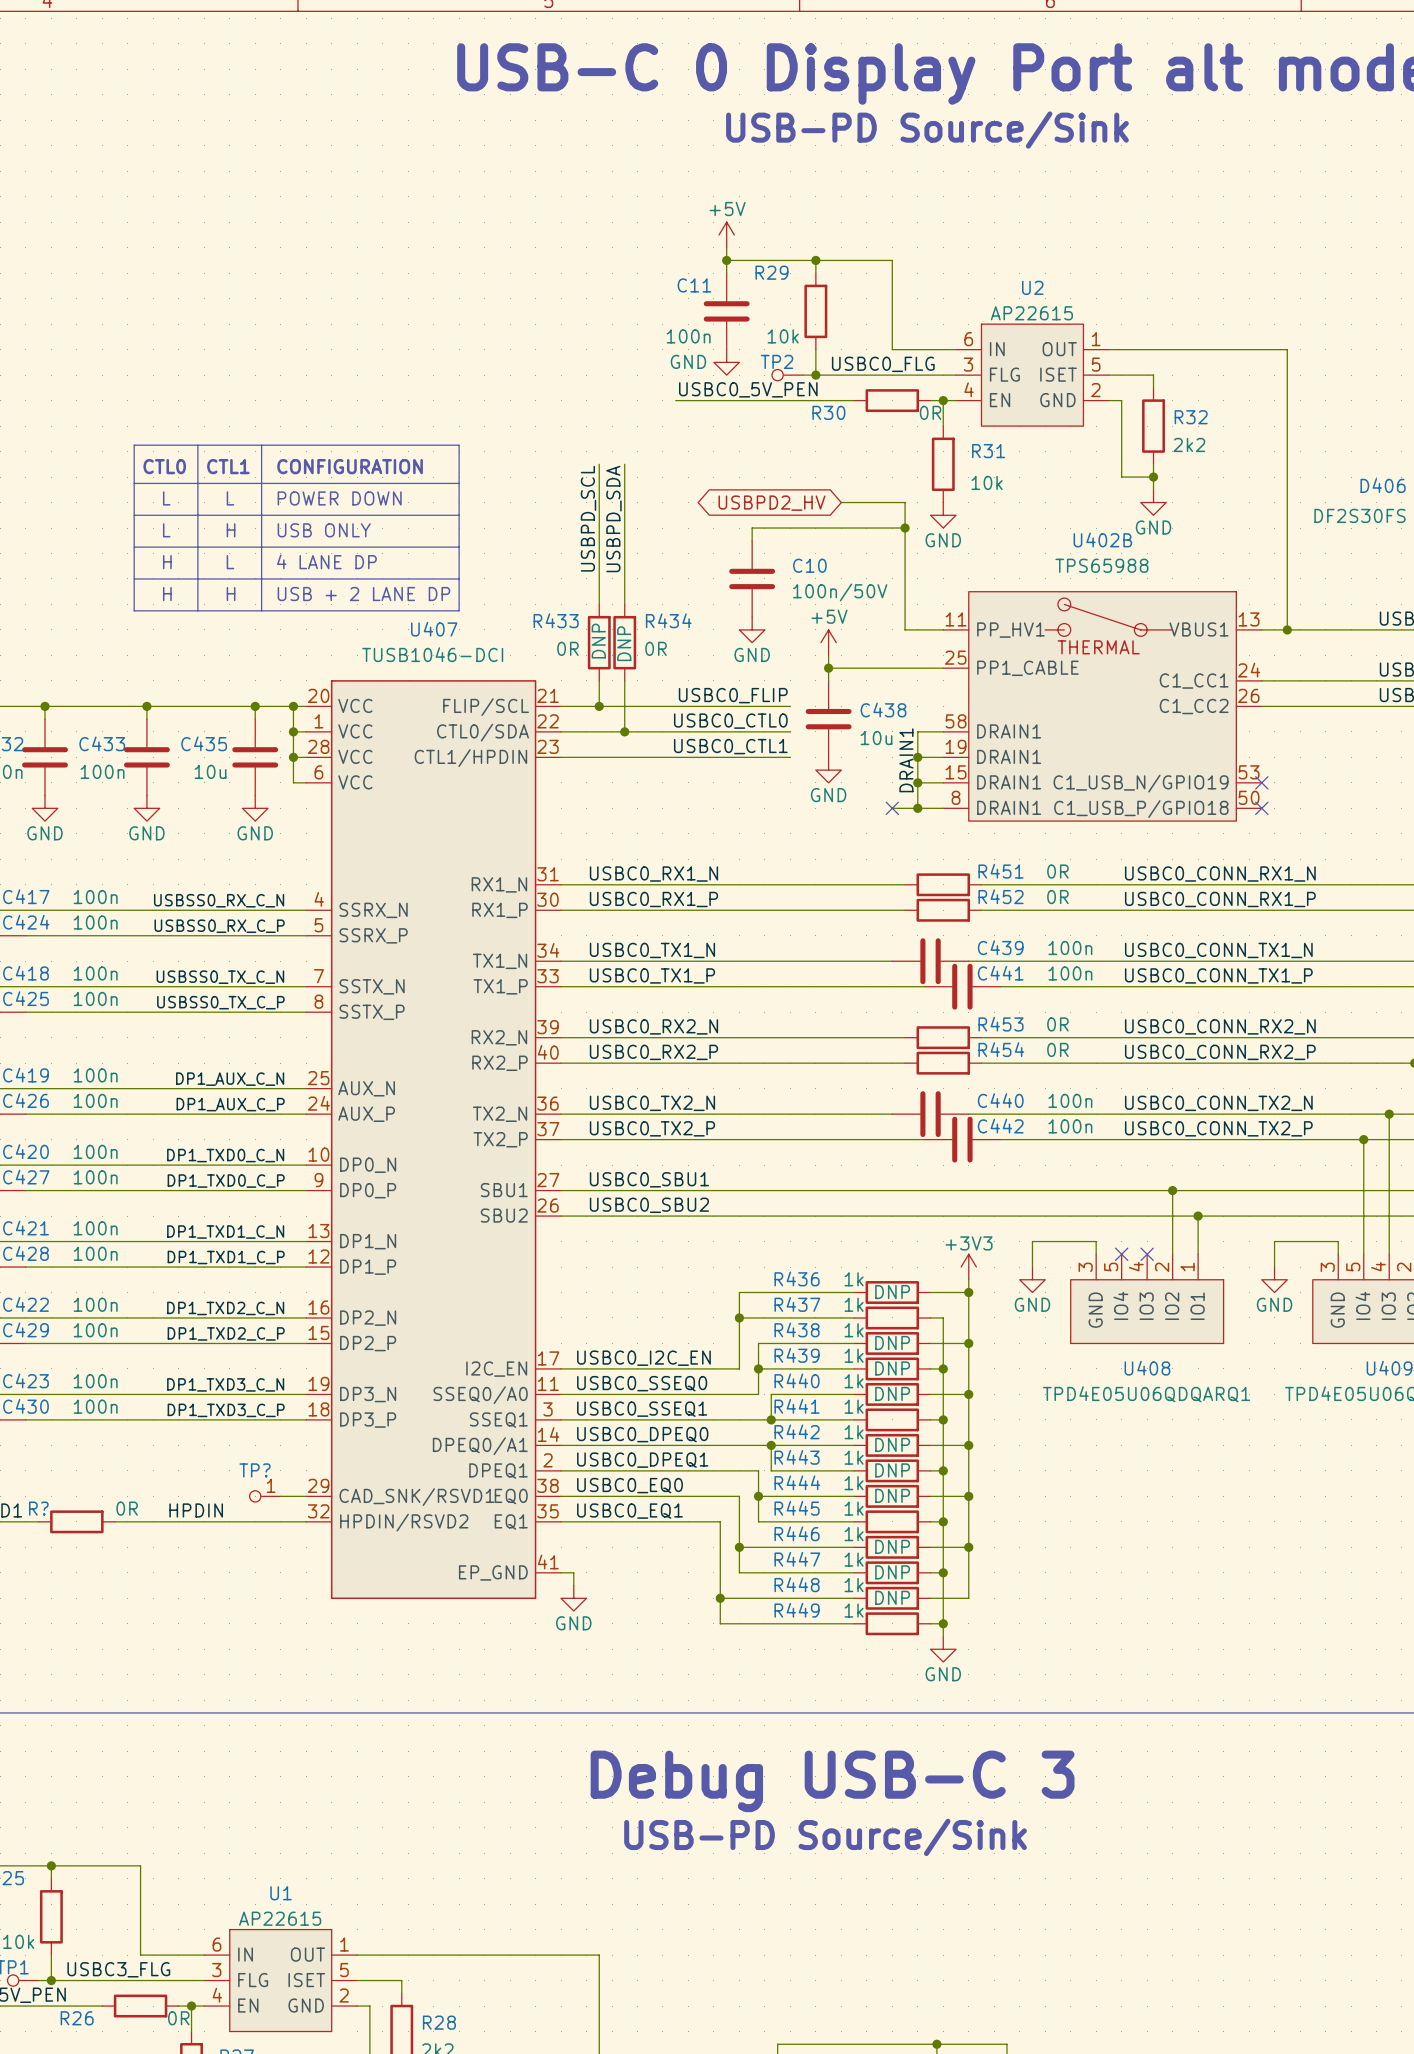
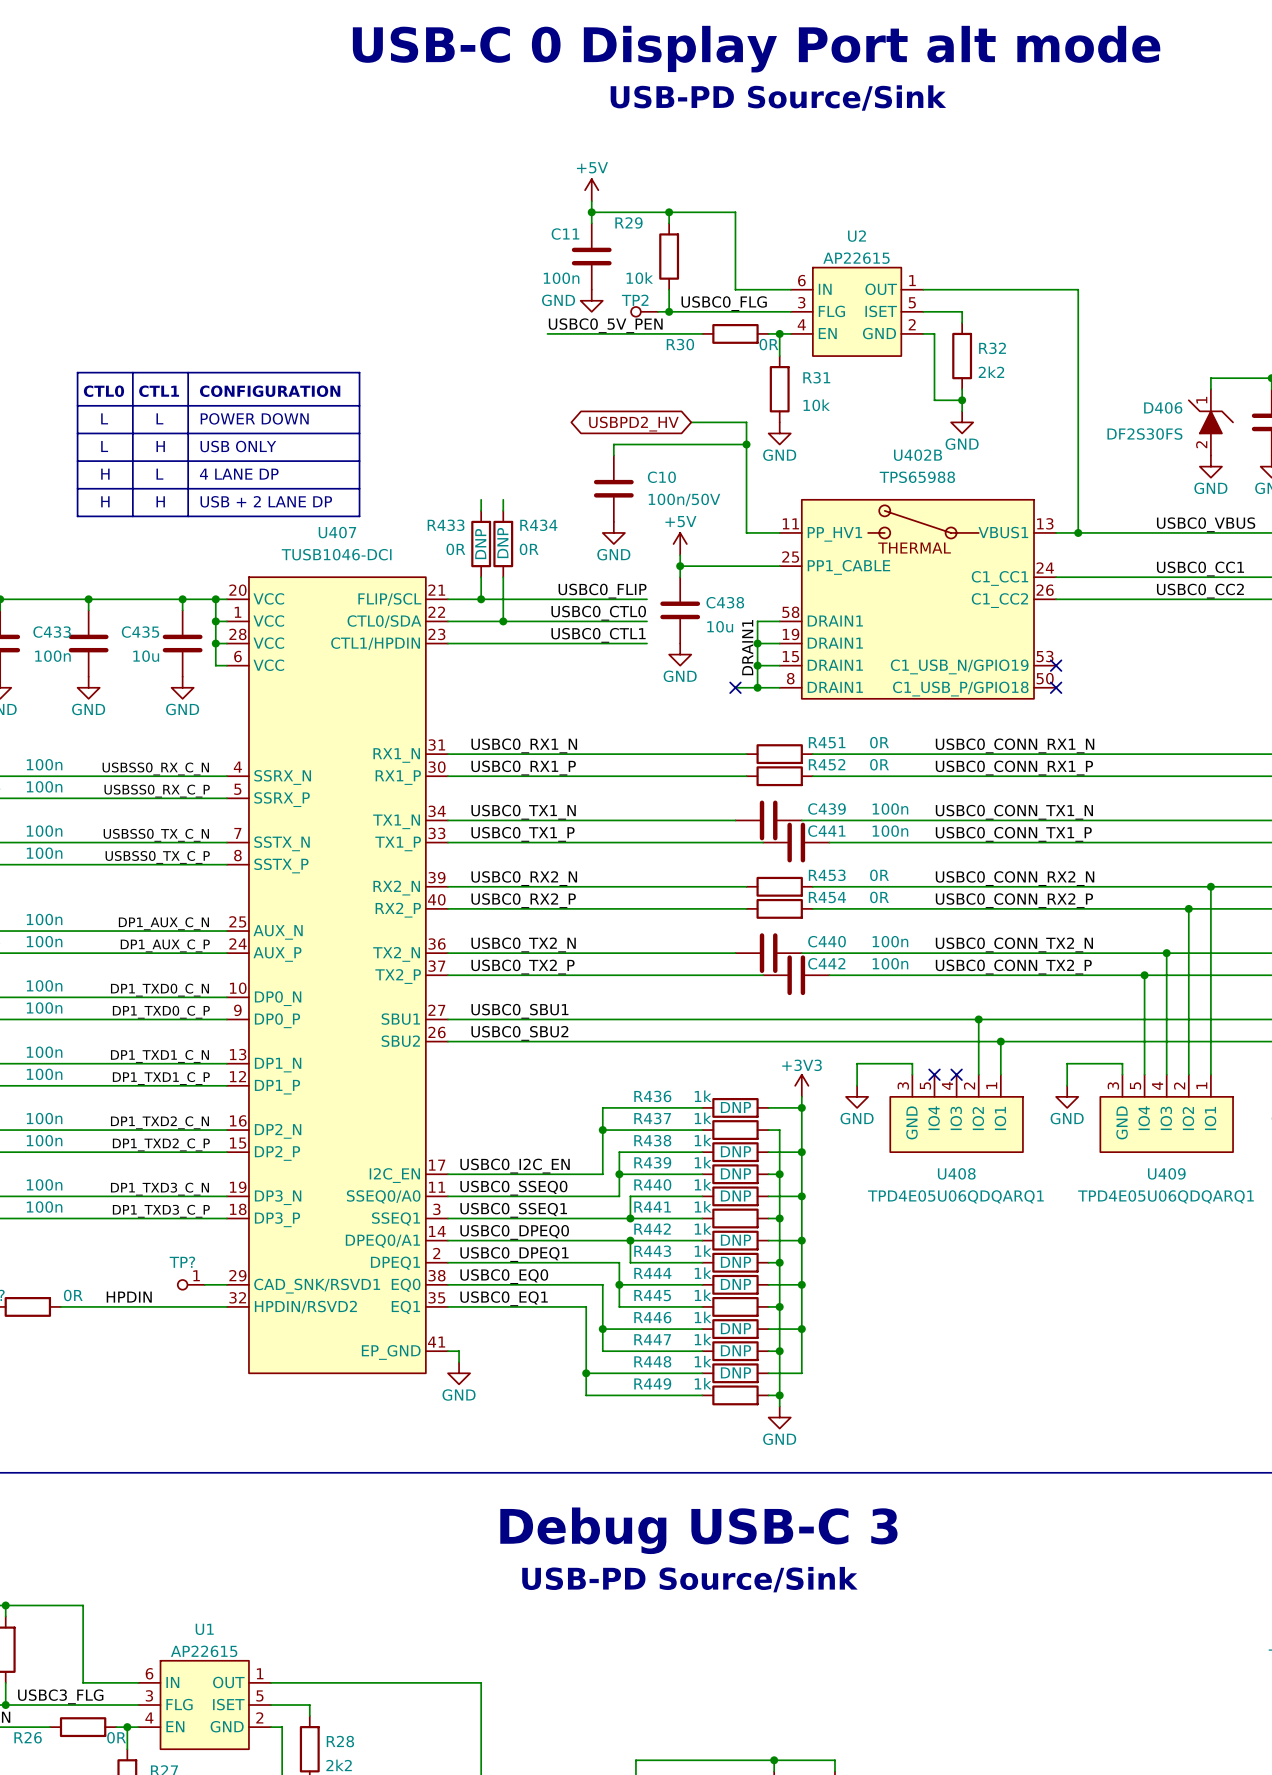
wire: (599, 464) (599, 591) -> none
wire: (624, 464) (624, 591) -> none
label: USBPD_SCL (588, 518) -> none
label: USBPD_SDA (613, 519) -> none

